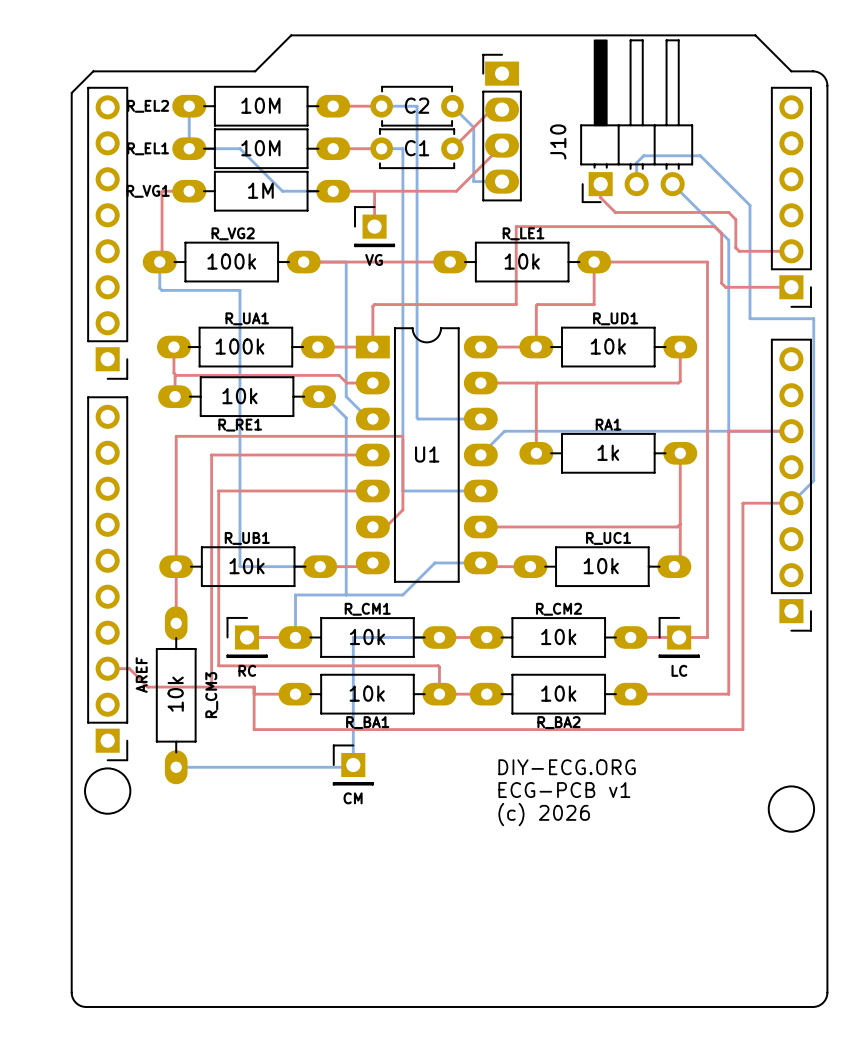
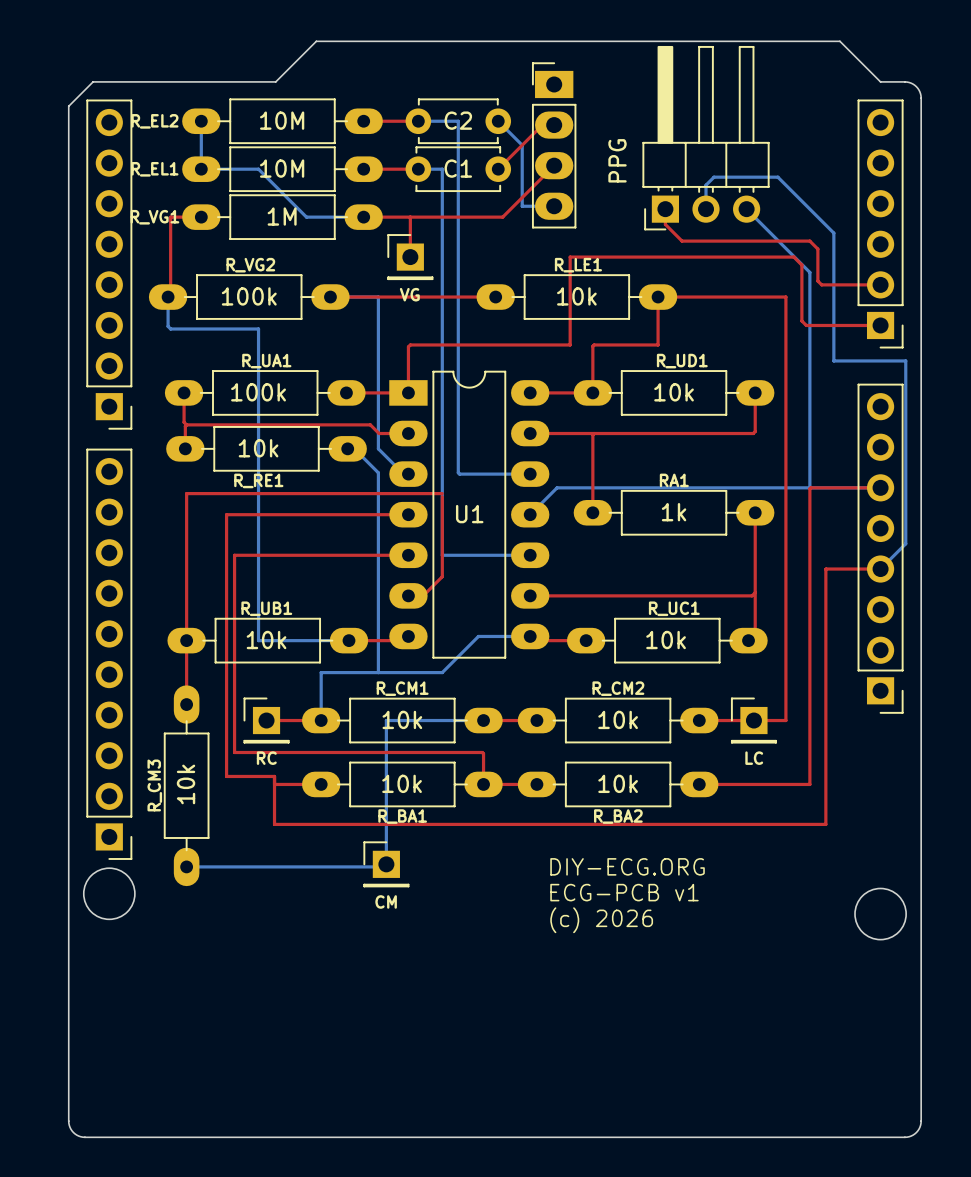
J10 name: J10 (558, 141) -> PPG (617, 160)
top track: (107, 668) (129, 668) (147, 687) (211, 687) -> none
text: AREF (141, 675) -> none
R_CM3 name position: R_CM3 (211, 695) -> R_CM3 (154, 785)

